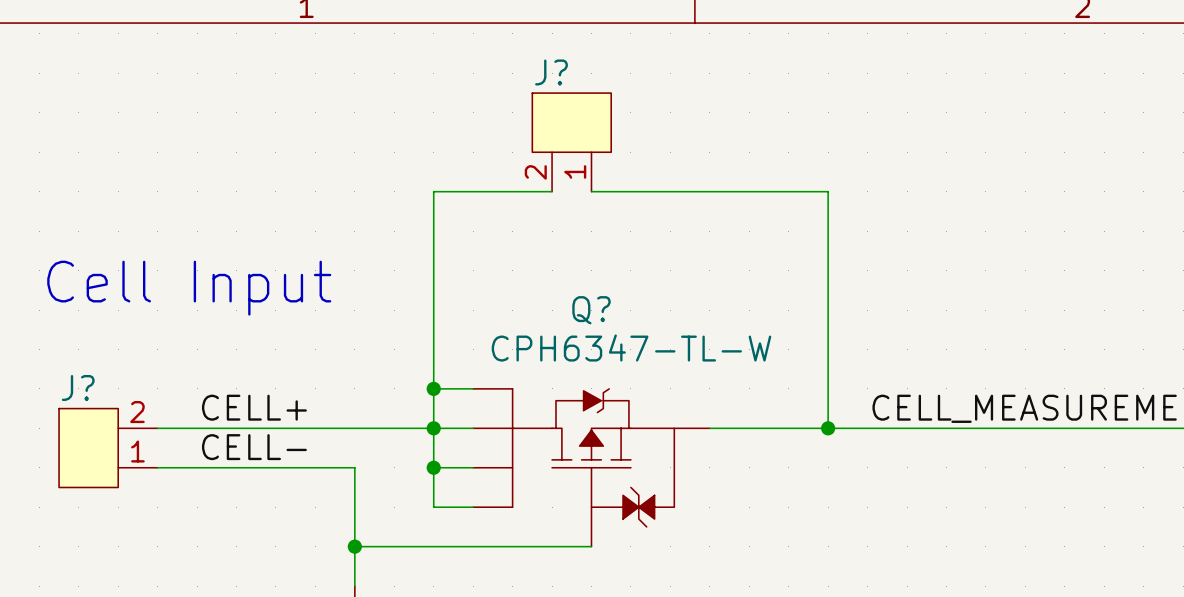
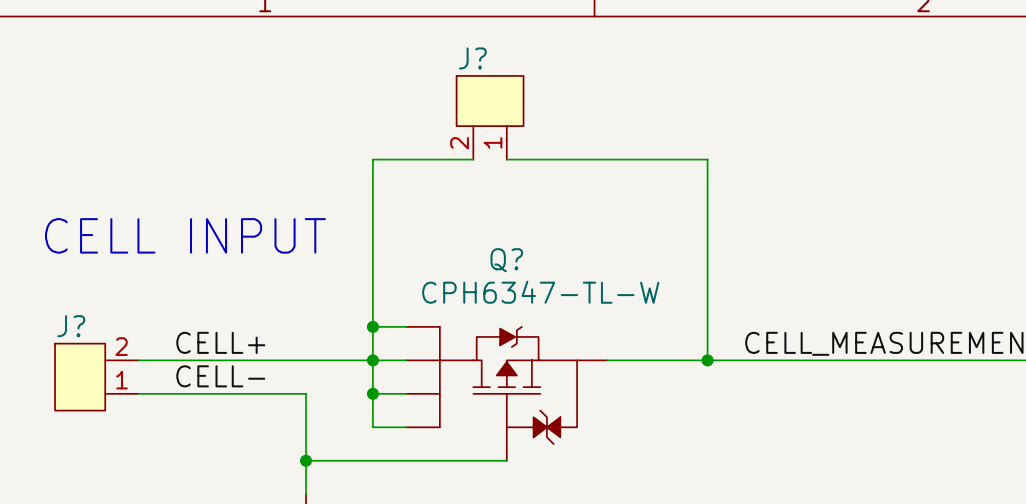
text: Cell Input (189, 288) -> CELL INPUT (185, 235)

